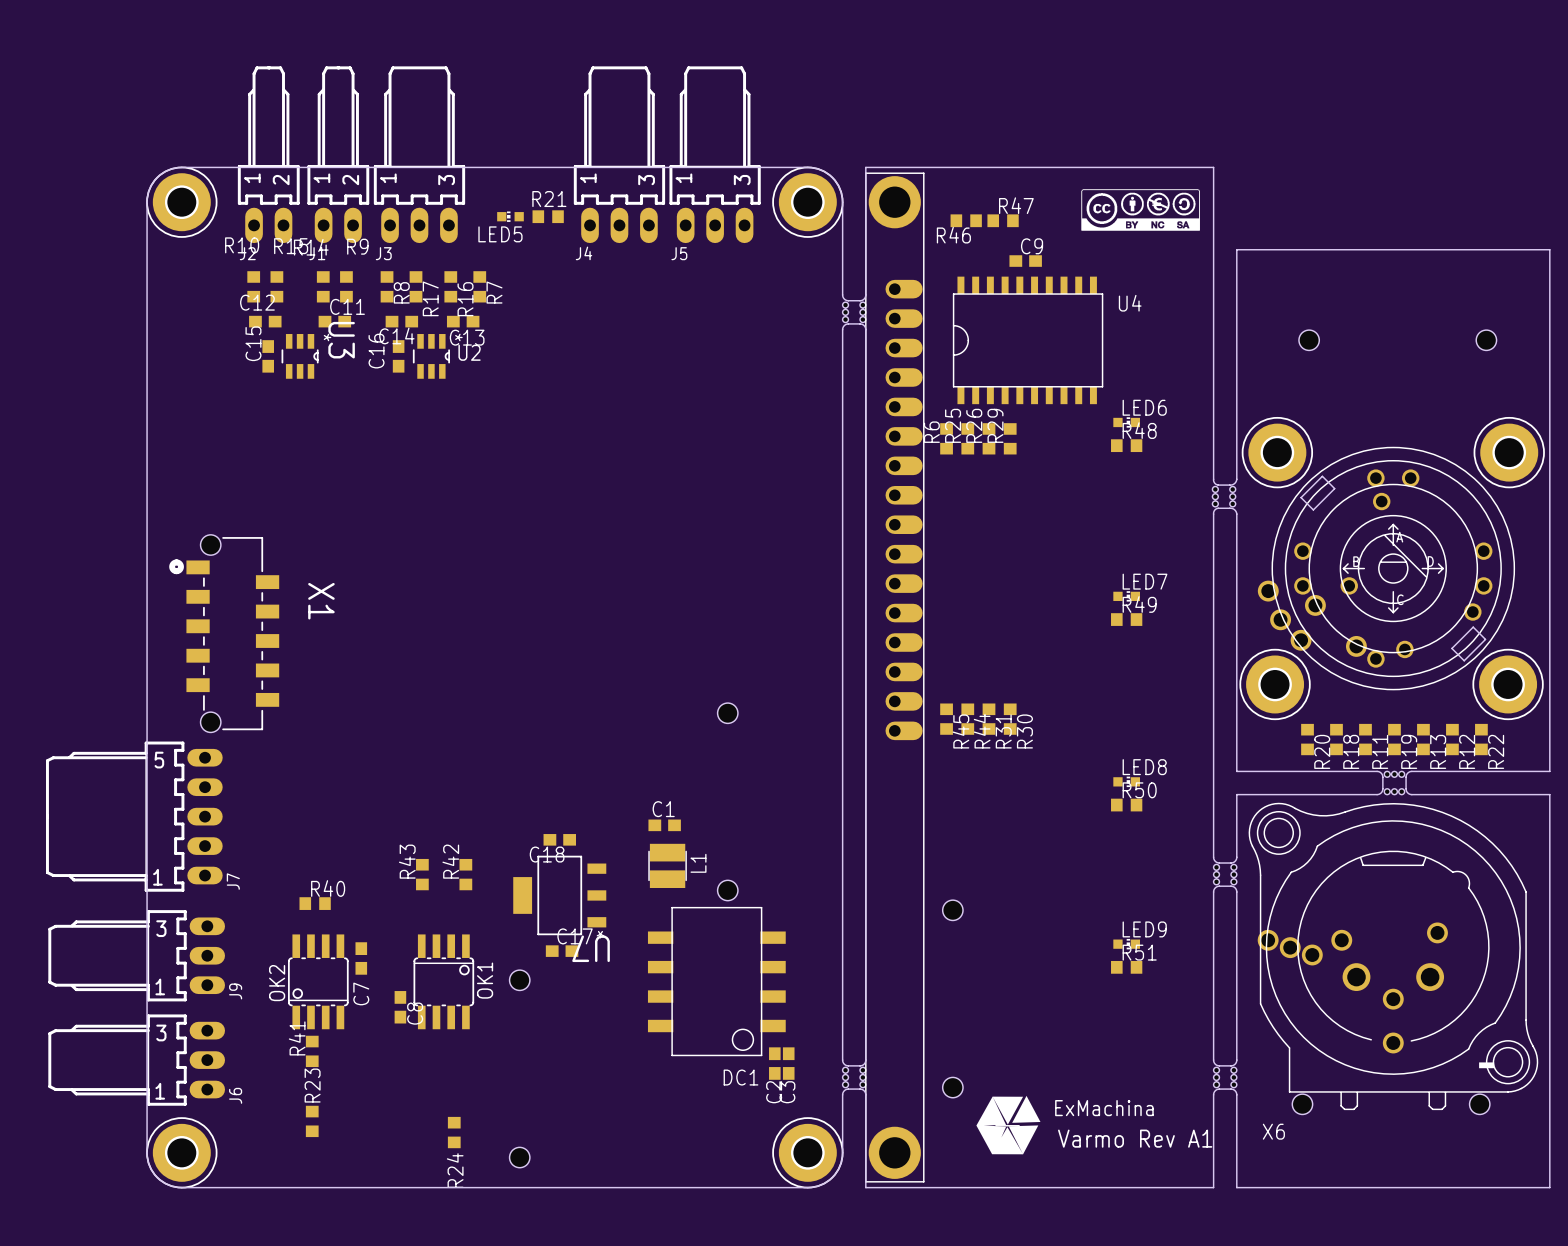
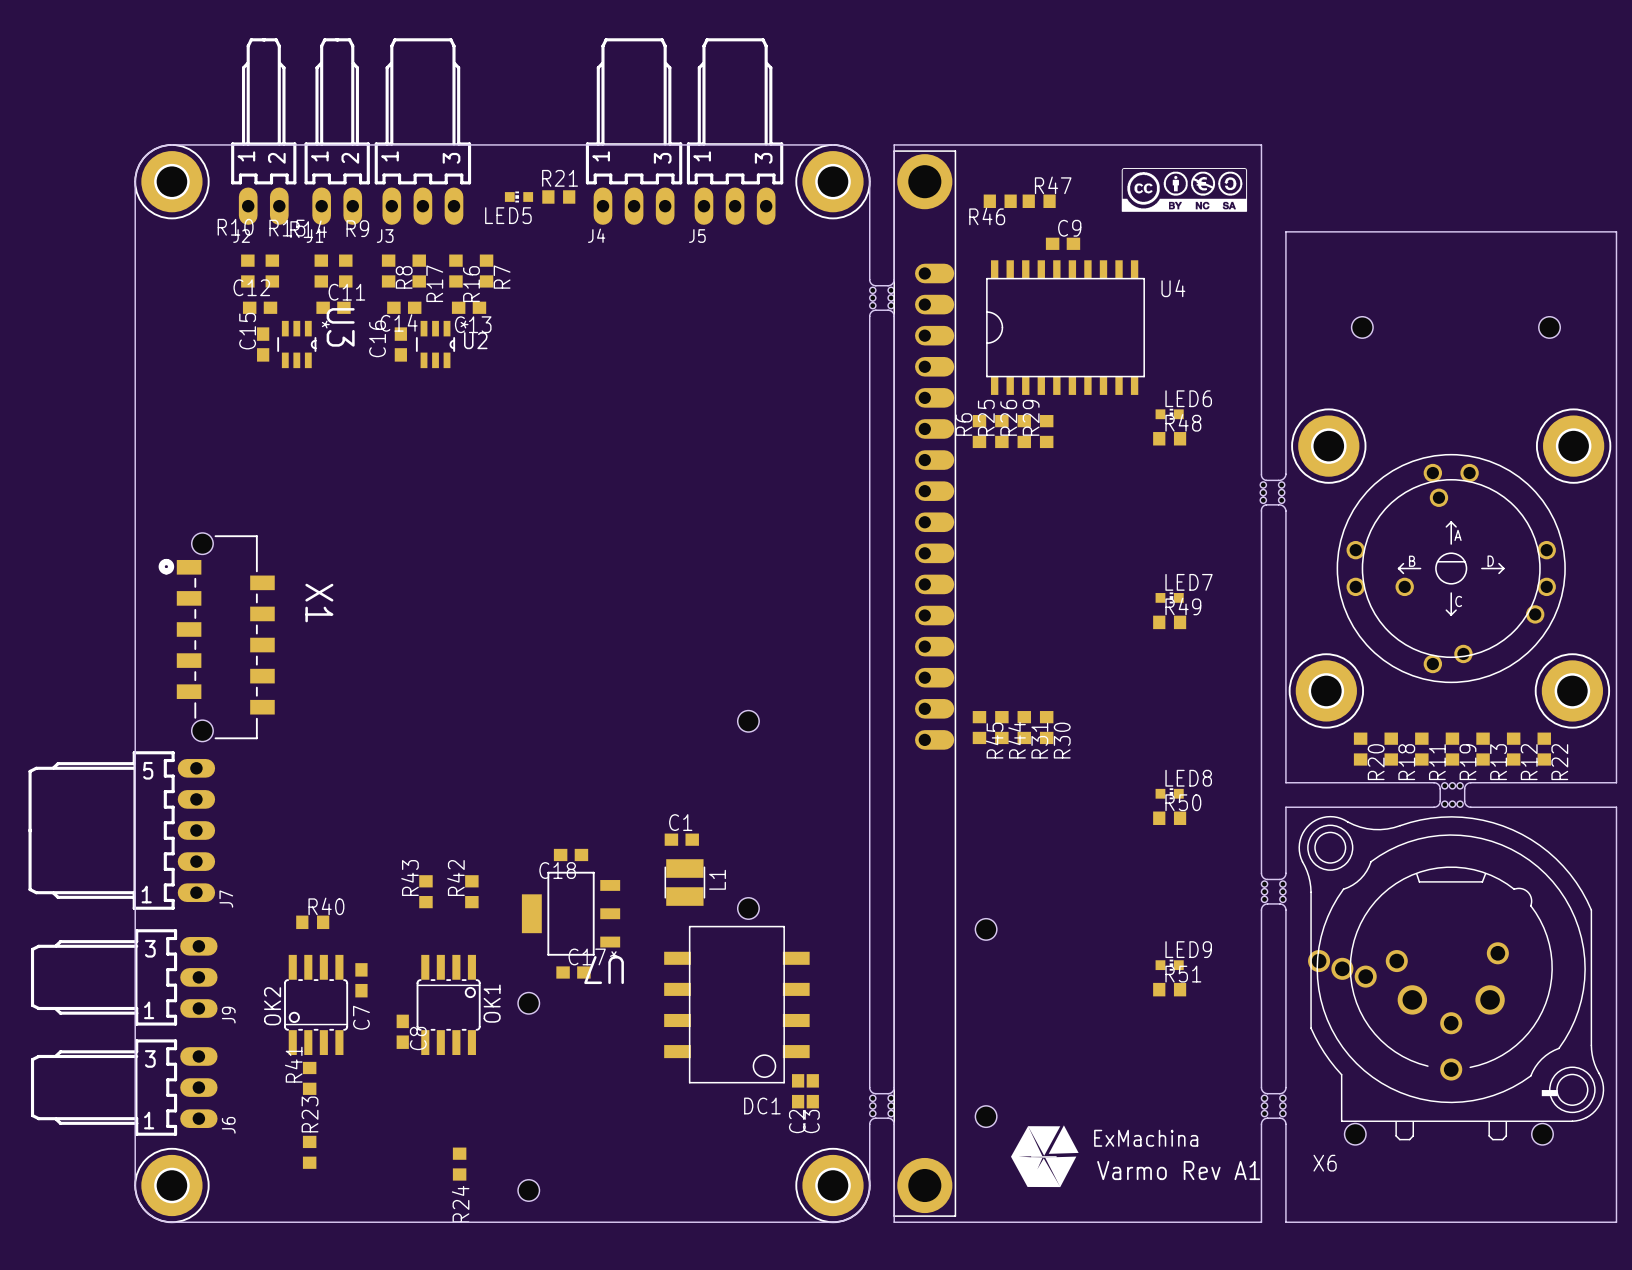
part: (1386, 568) -> none

